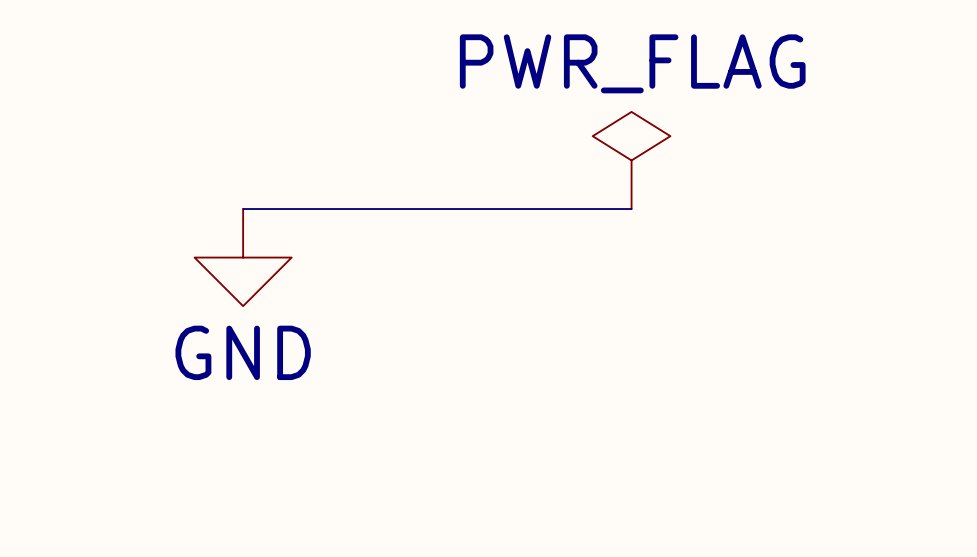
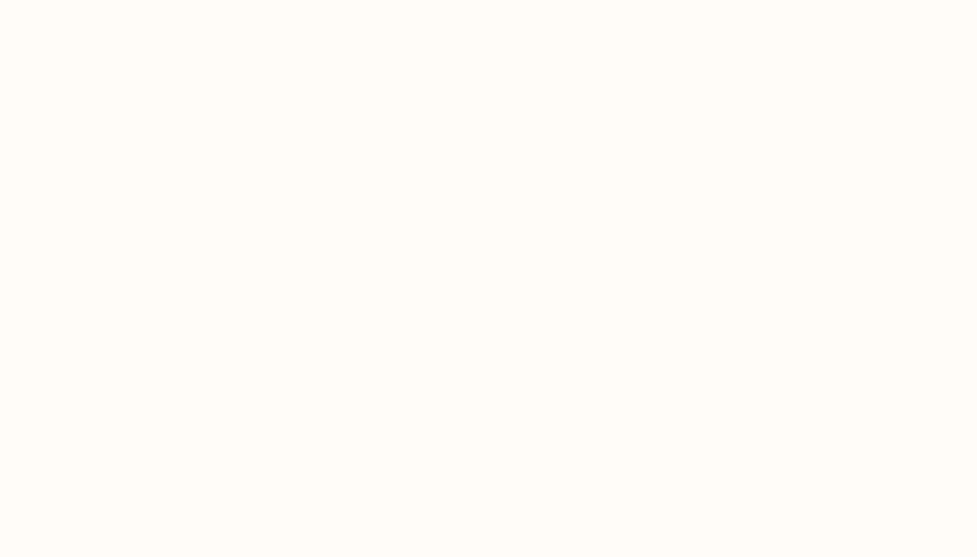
power symbol: PWR_FLAG (631, 160) -> none
wire: (243, 209) (631, 209) -> none
power symbol: GND (243, 257) -> none

